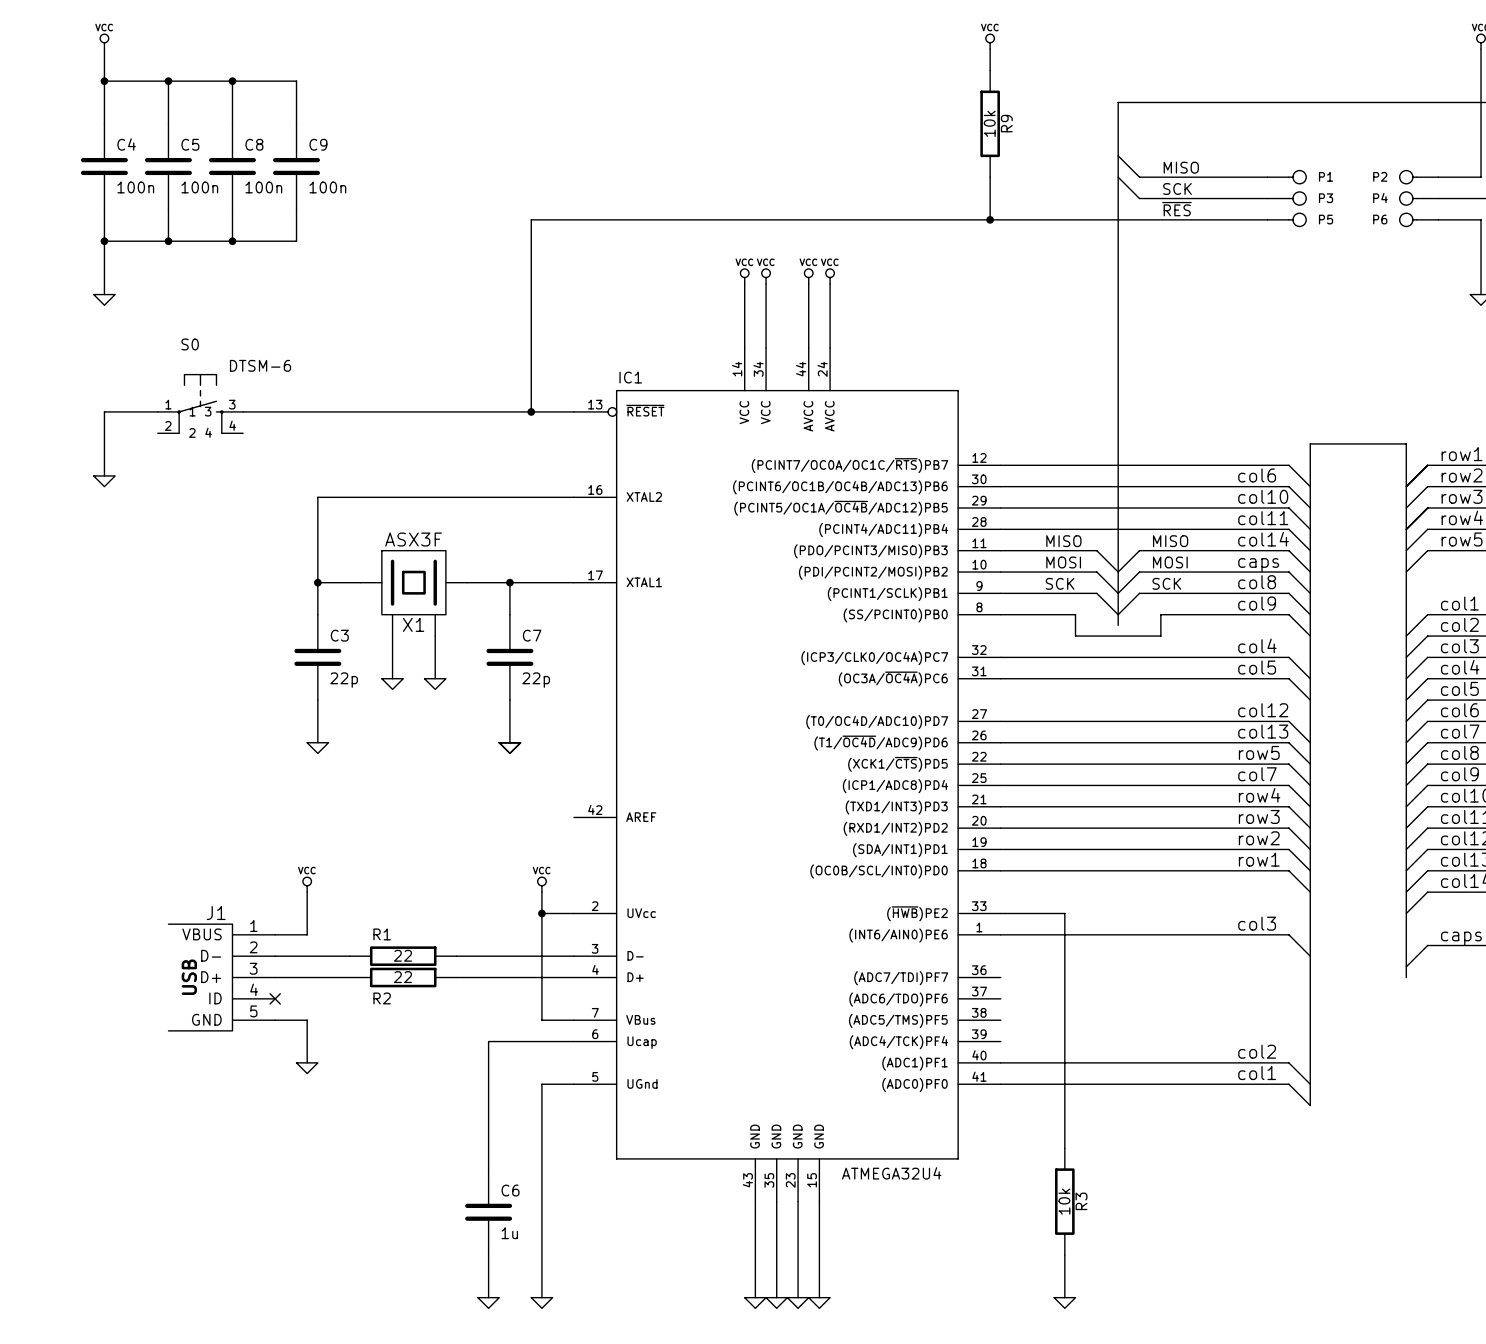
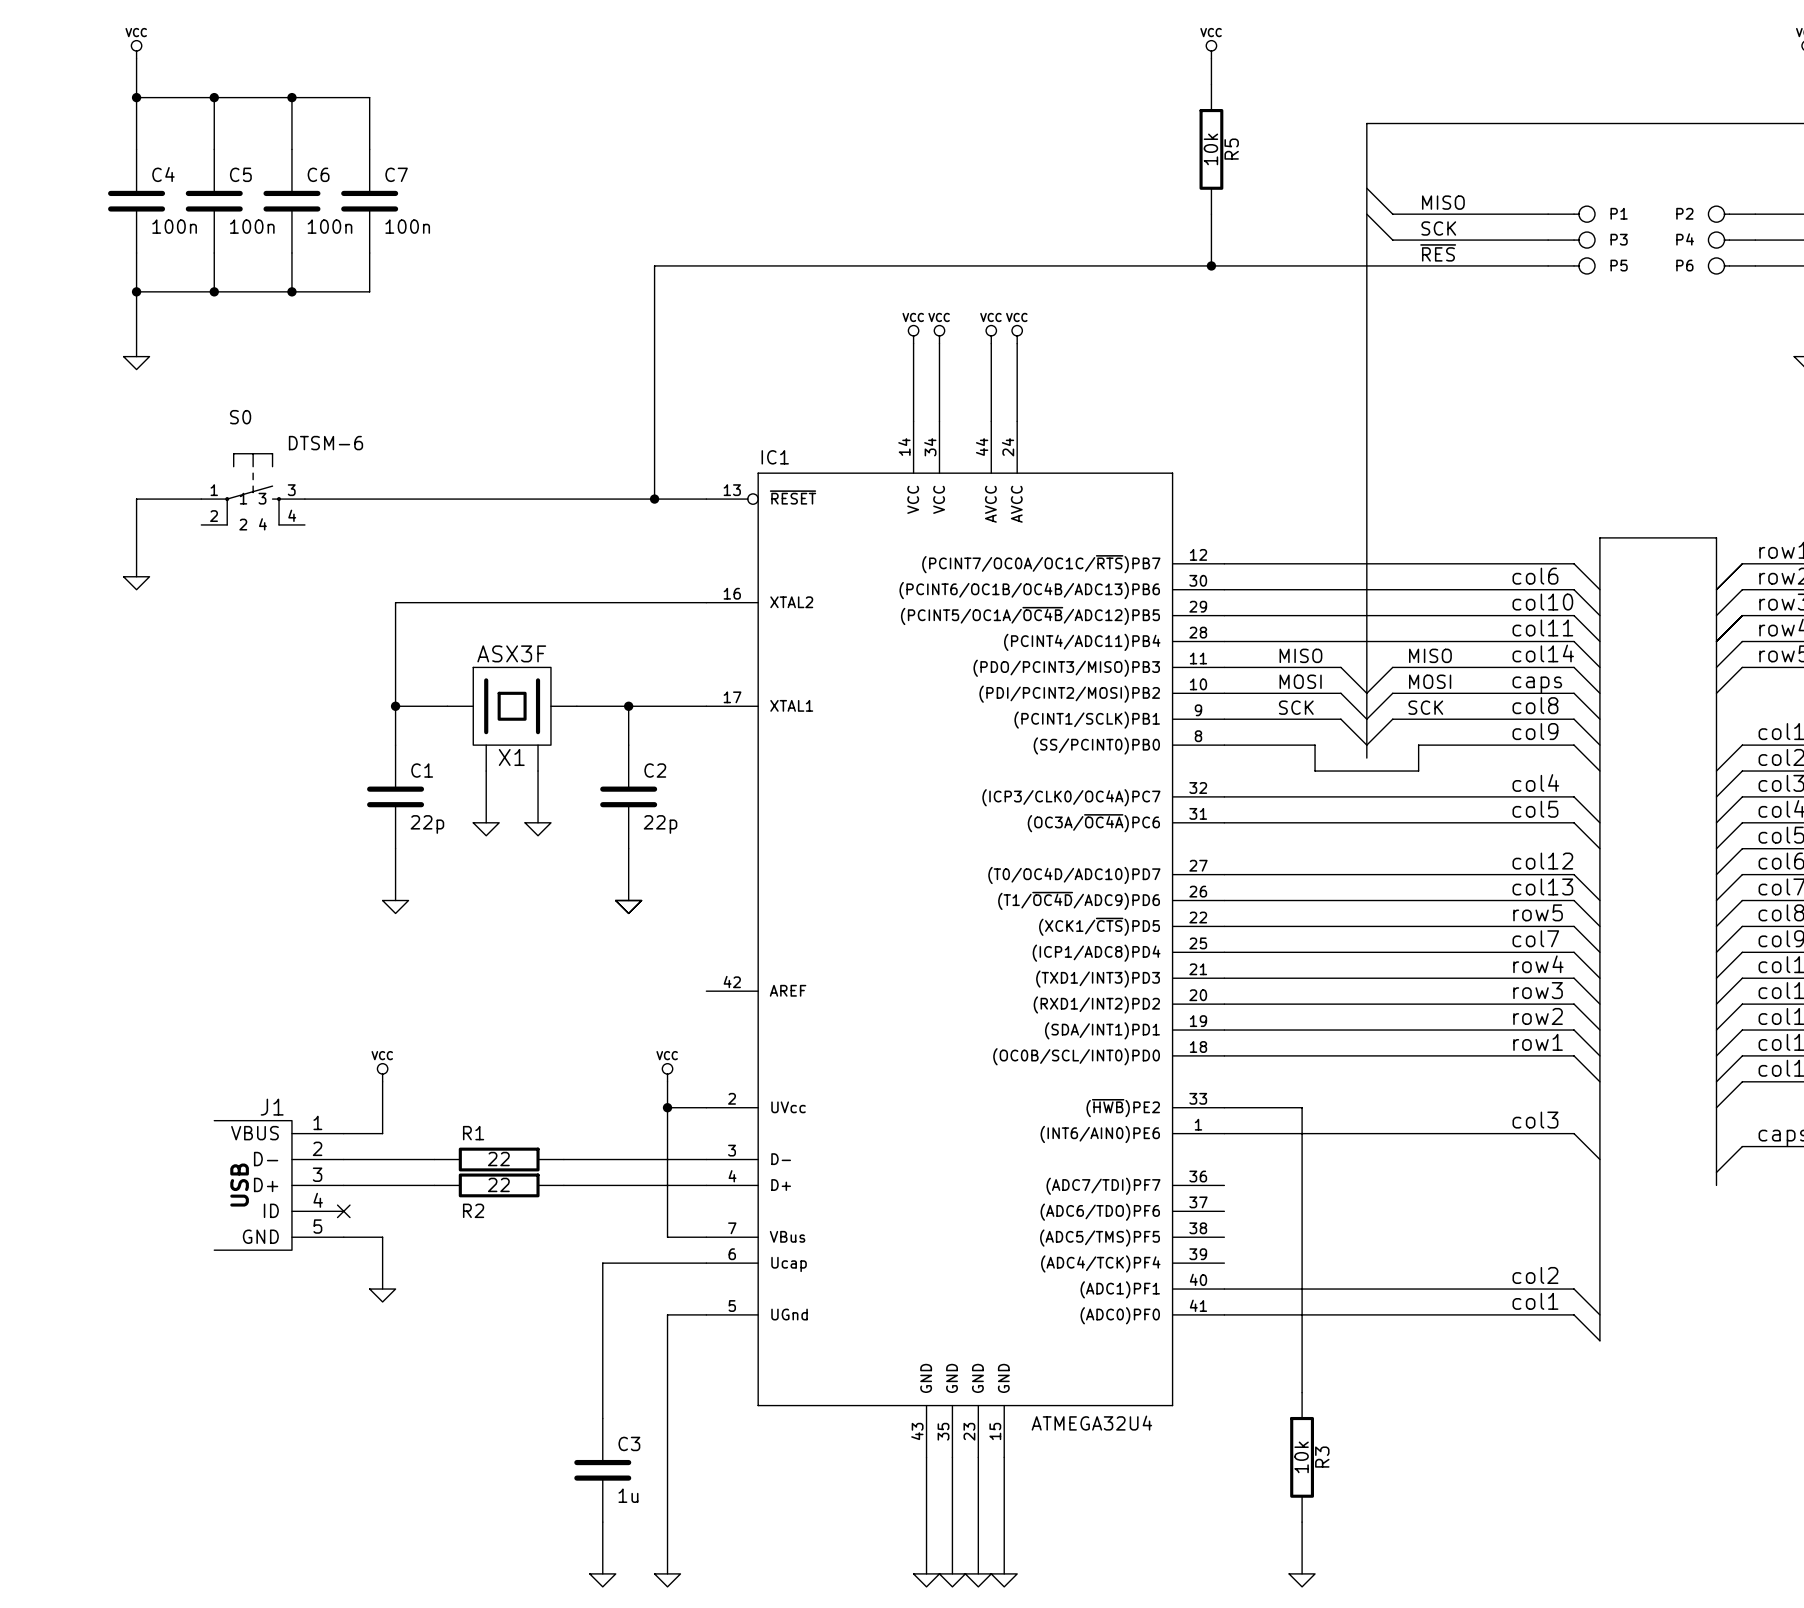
R9 name: R9 (1006, 123) -> R5 (1231, 149)
C8 name: C8 (254, 144) -> C6 (318, 174)
C9 name: C9 (318, 144) -> C7 (396, 174)
C3 name: C3 (339, 635) -> C1 (422, 770)
C7 name: C7 (532, 635) -> C2 (655, 770)
C6 name: C6 (510, 1190) -> C3 (629, 1443)

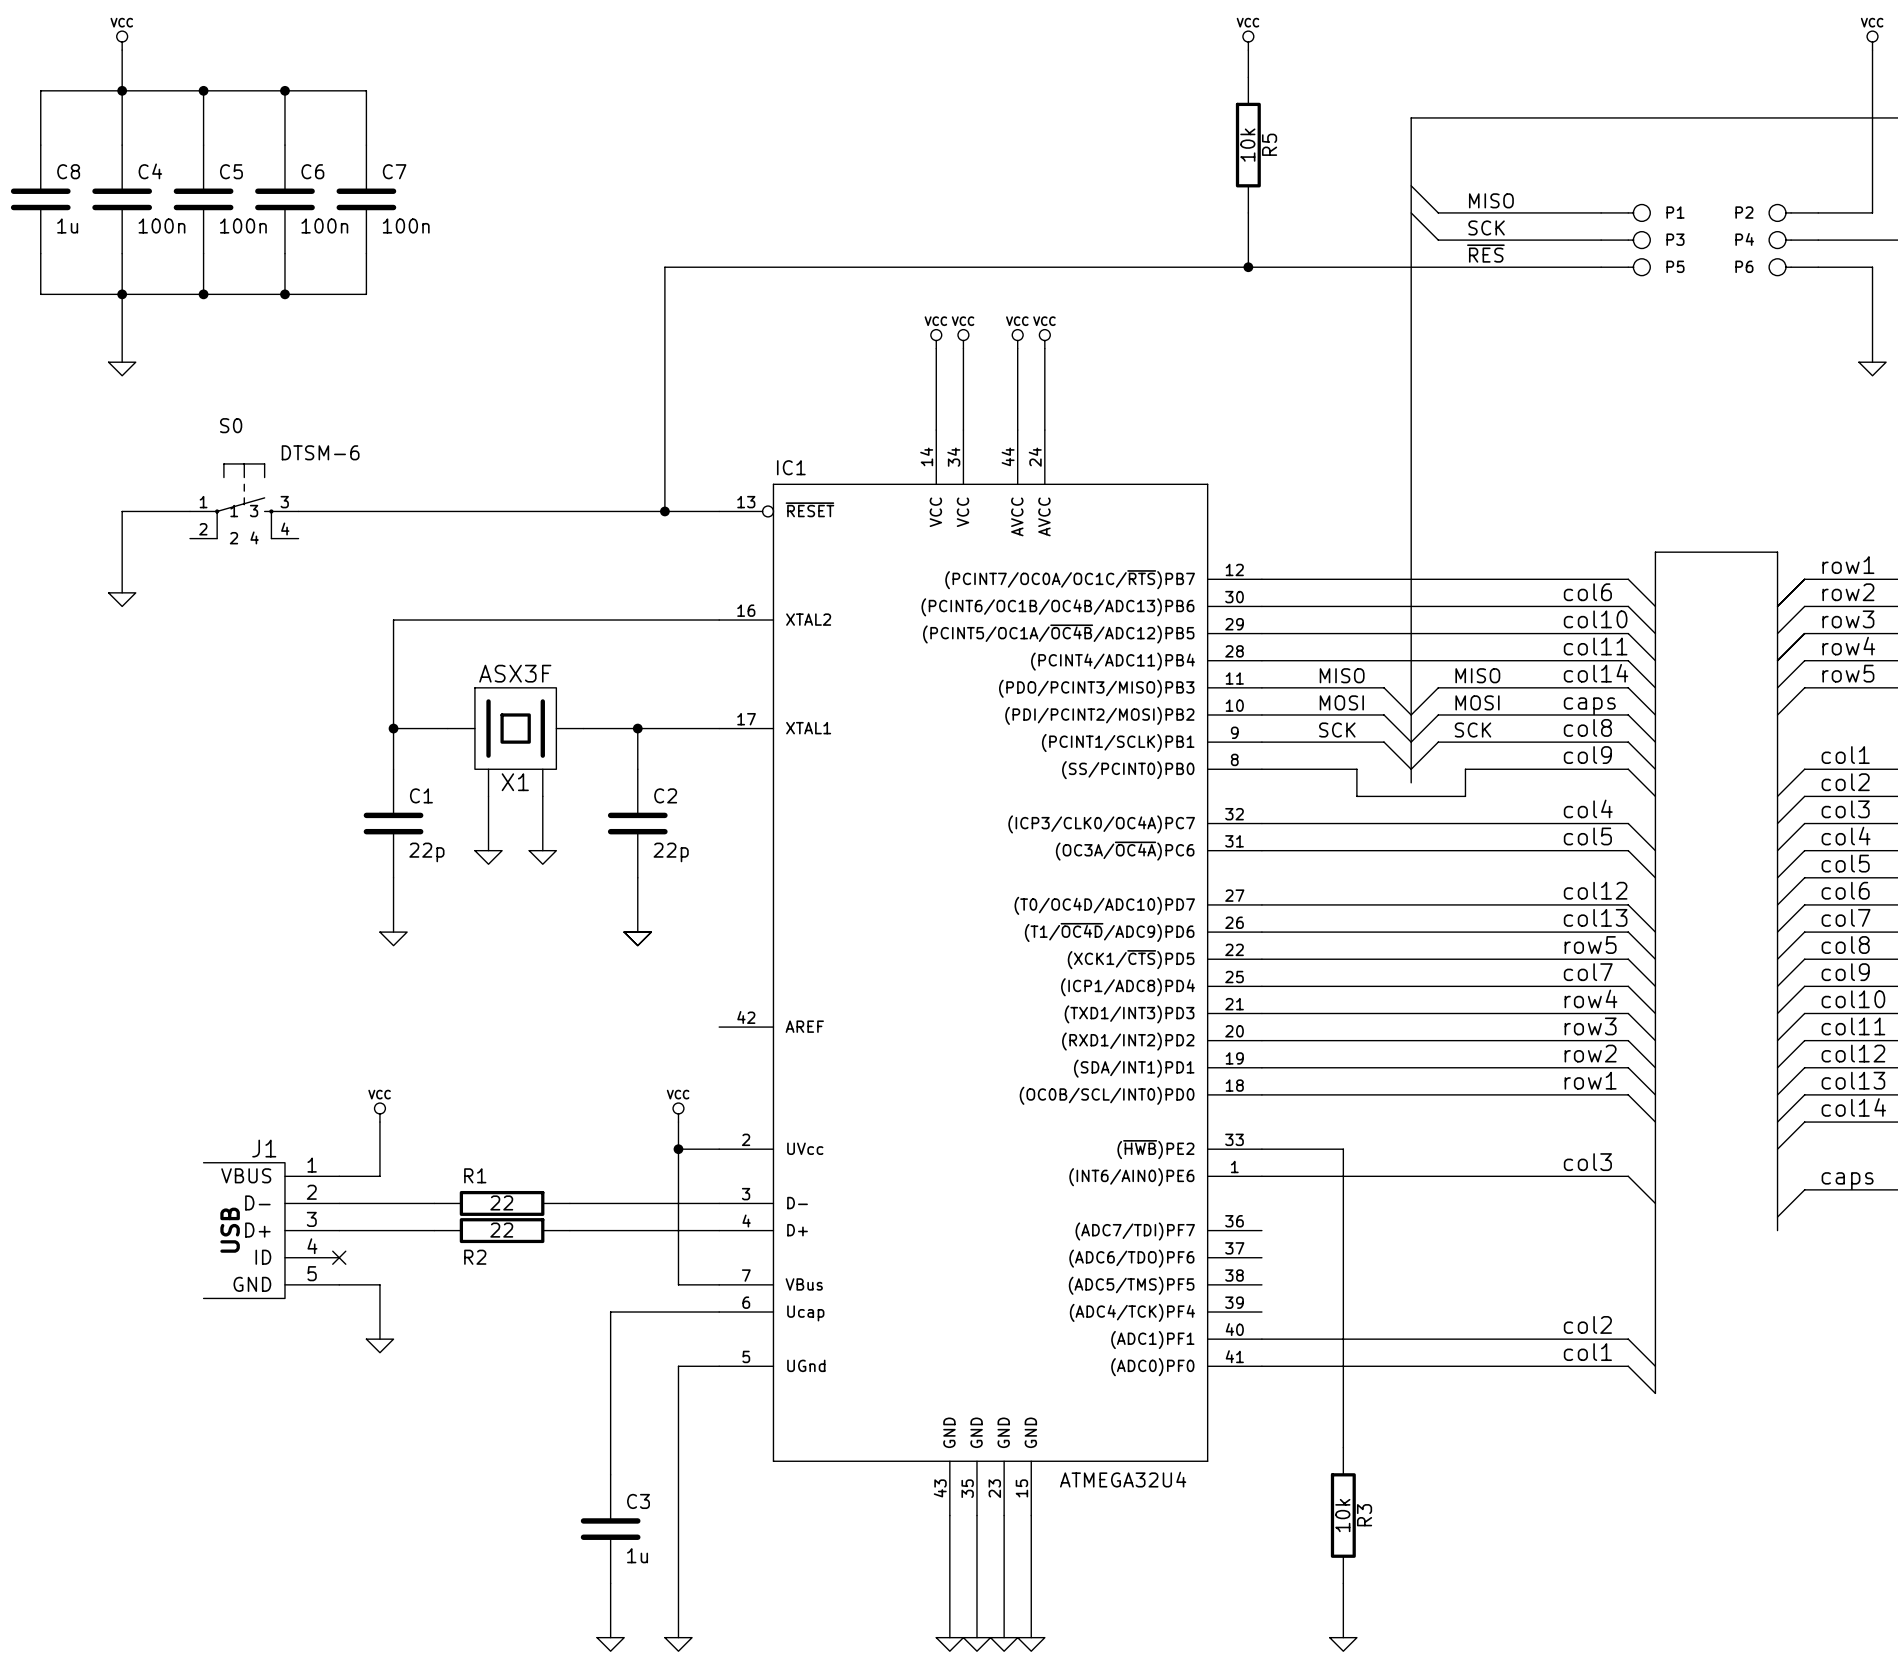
wire: none -> (122, 90) (40, 90) (40, 145)
C8: none -> 1u (40, 199)
wire: none -> (40, 253) (40, 294) (122, 294)

